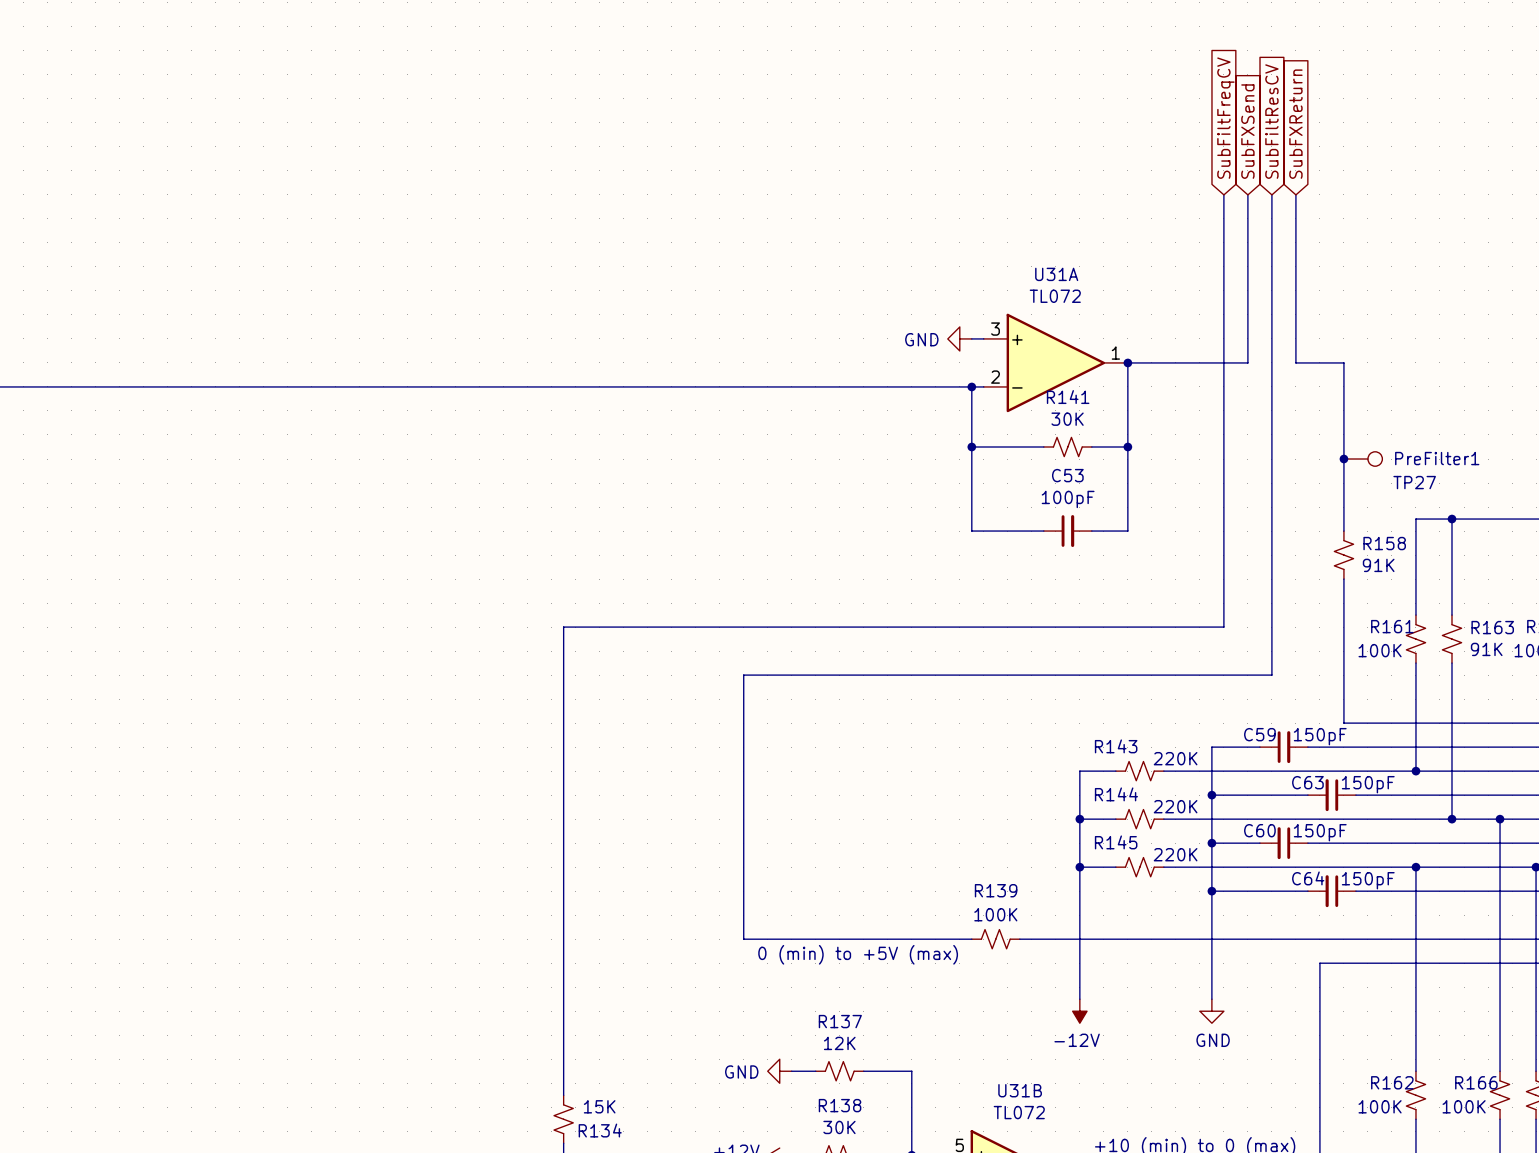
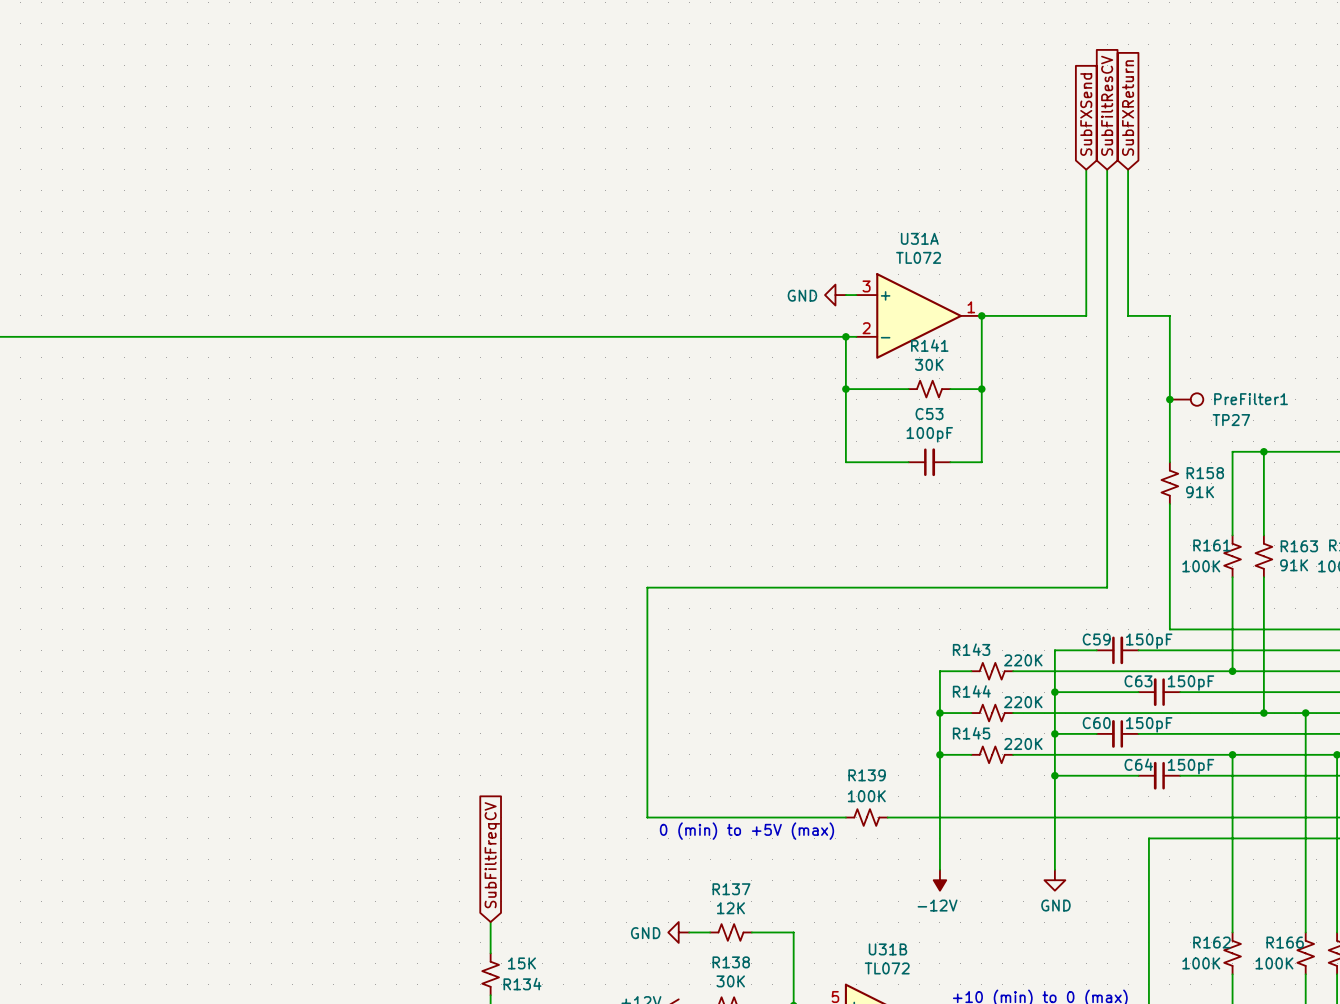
global label: SubFiltFreqCV (1225, 118) -> none
wire: (1223, 194) (1223, 627) (563, 627) (563, 1059) -> none
global label: none -> SubFiltFreqCV (492, 855)

